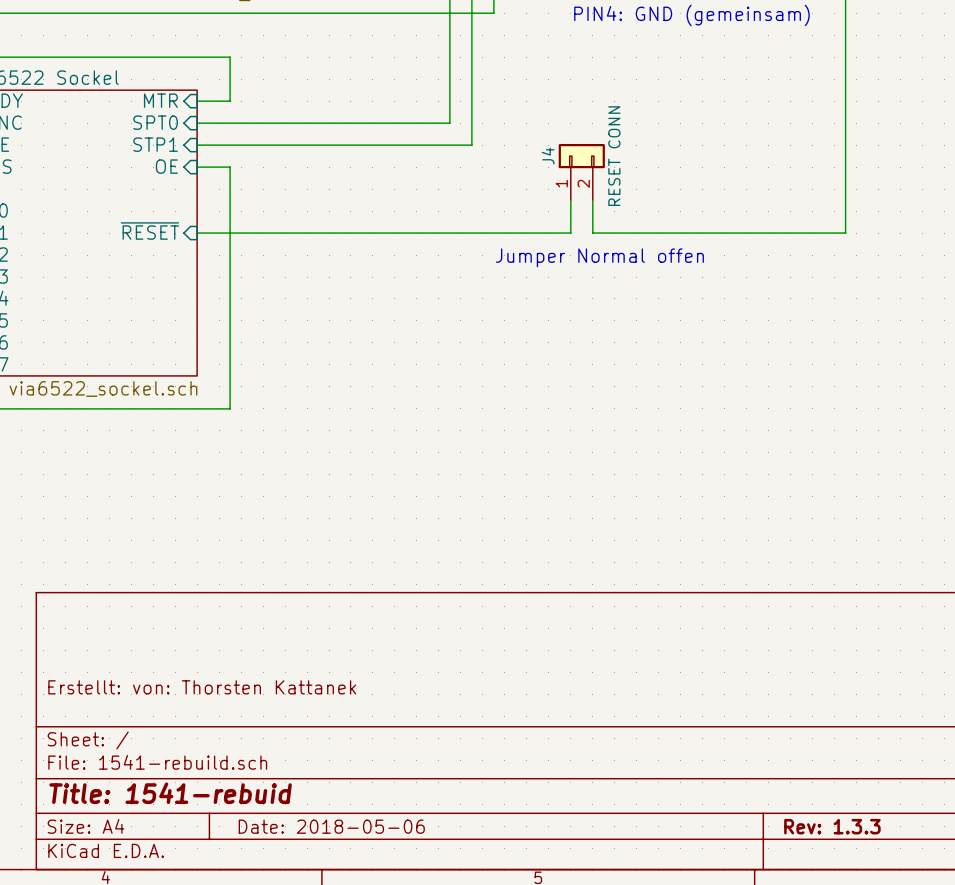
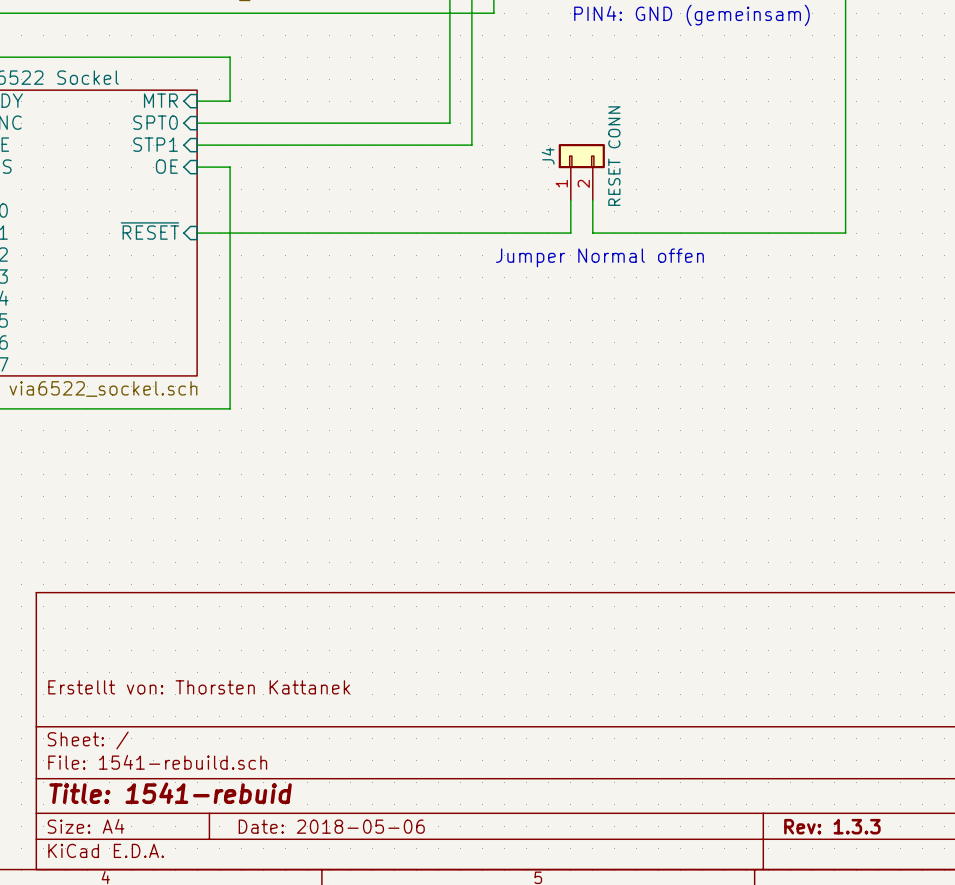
title block: Erstellt: von: Thorsten Kattanek (202, 687) -> Erstellt von: Thorsten Kattanek (199, 687)

